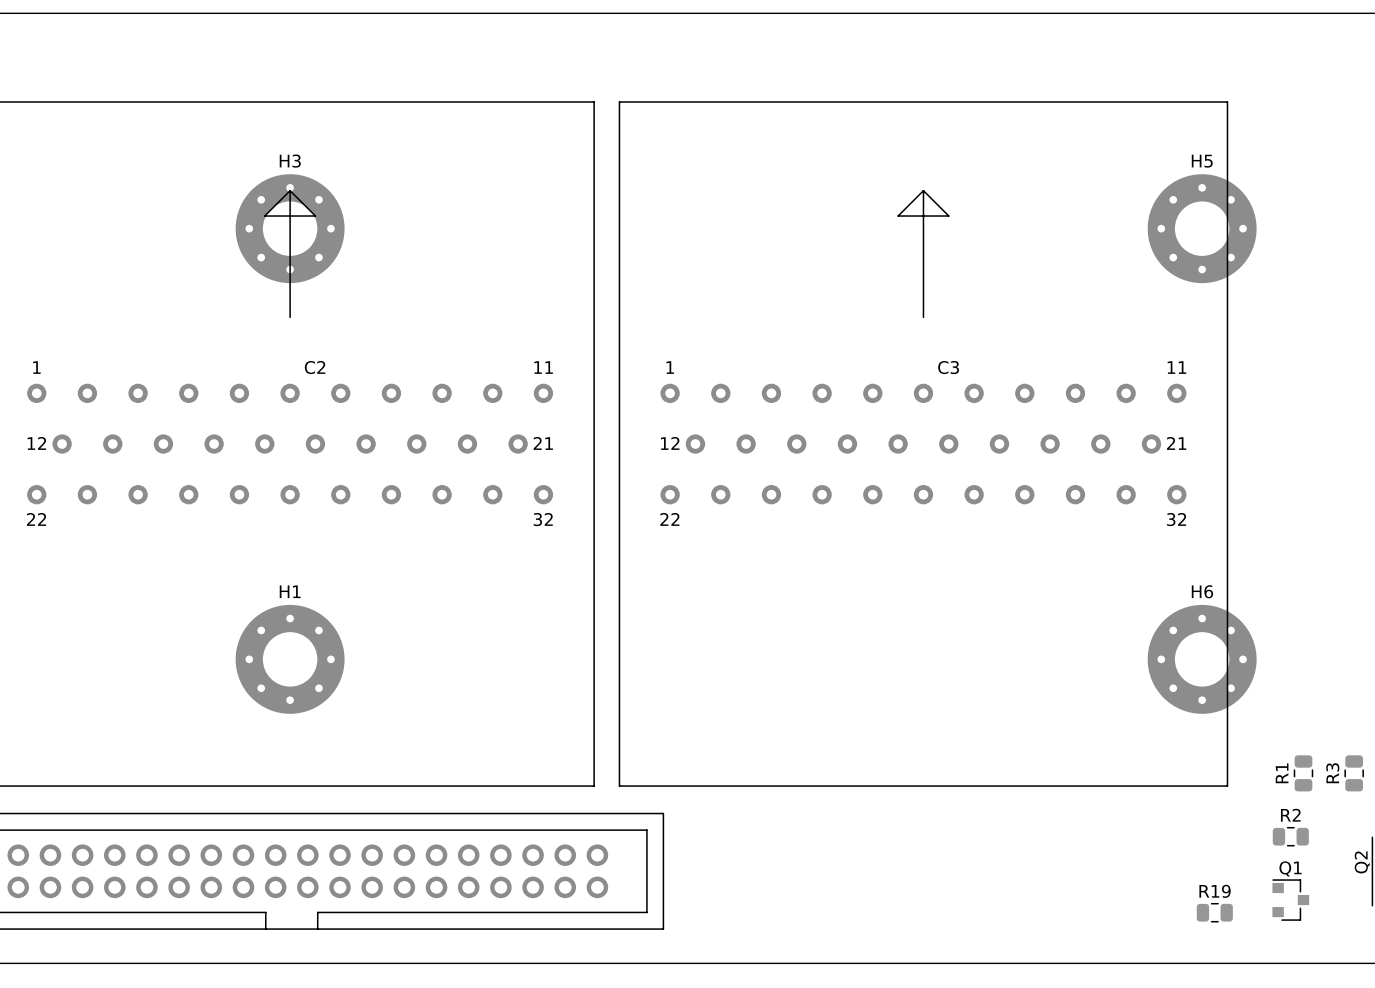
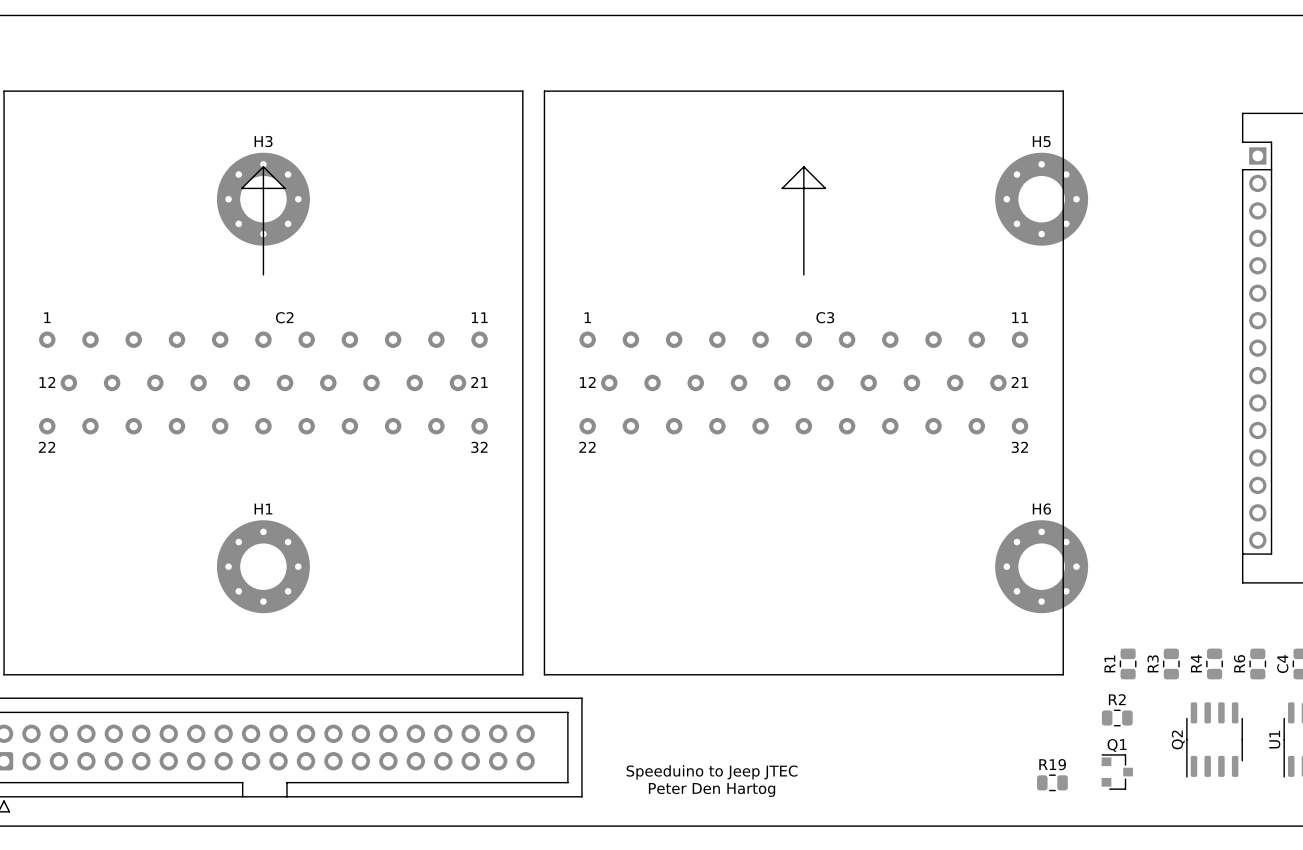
text: none -> Speeduino to Jeep JTEC (712, 772)
text: none -> Peter Den Hartog (712, 789)

